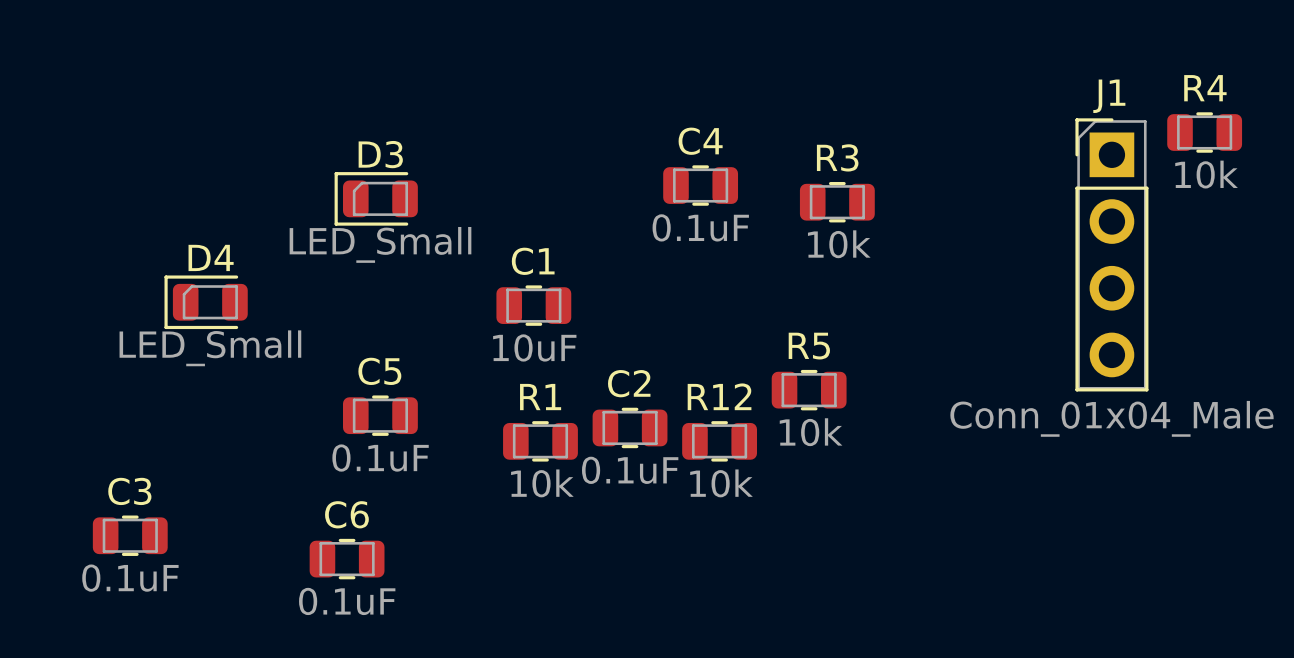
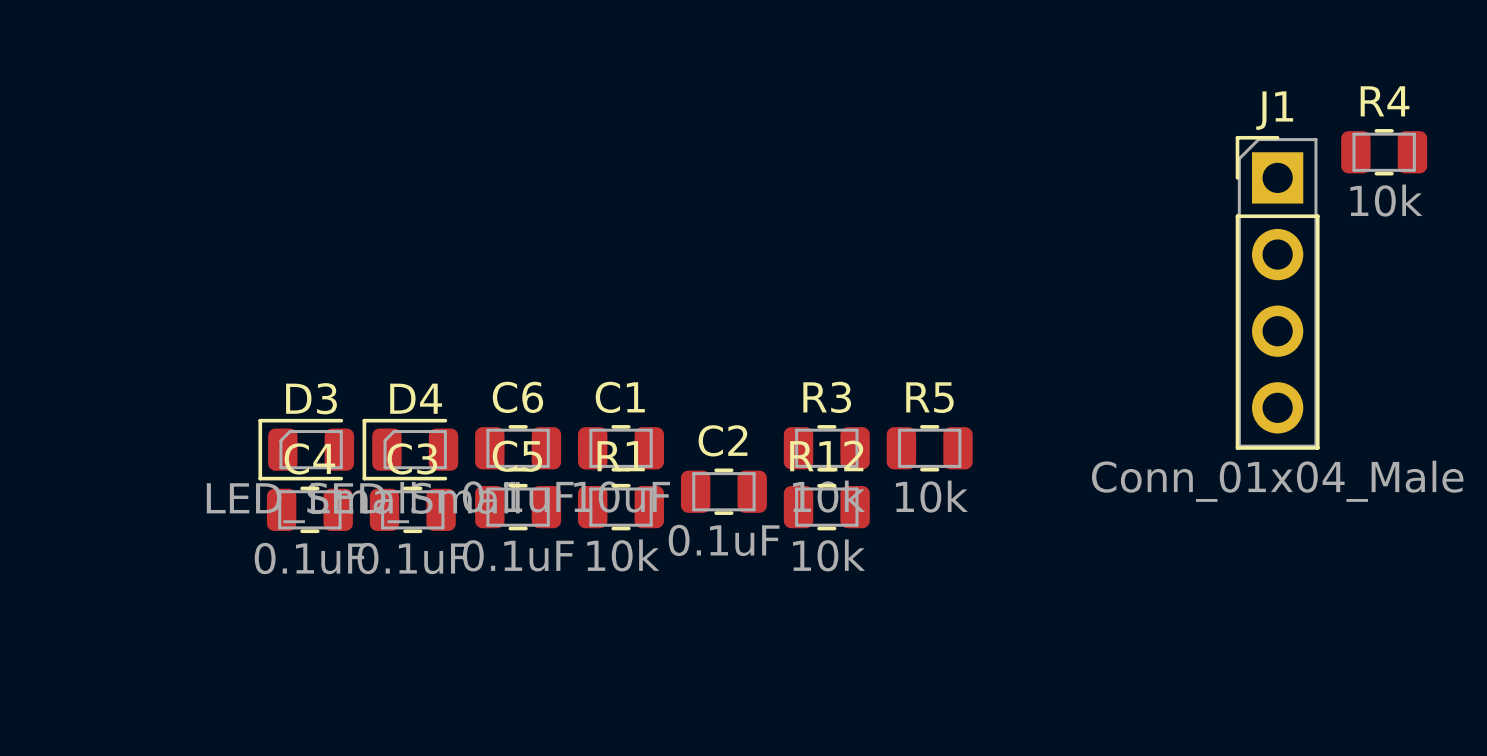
C4 position: (700, 185) -> (309, 509)
D3 position: (376, 198) -> (306, 449)
R3 position: (837, 202) -> (826, 448)
D4 position: (206, 302) -> (410, 449)
C1 position: (533, 305) -> (621, 448)
C5 position: (380, 415) -> (518, 507)
C3 position: (130, 535) -> (412, 509)
C6 position: (347, 559) -> (518, 448)

